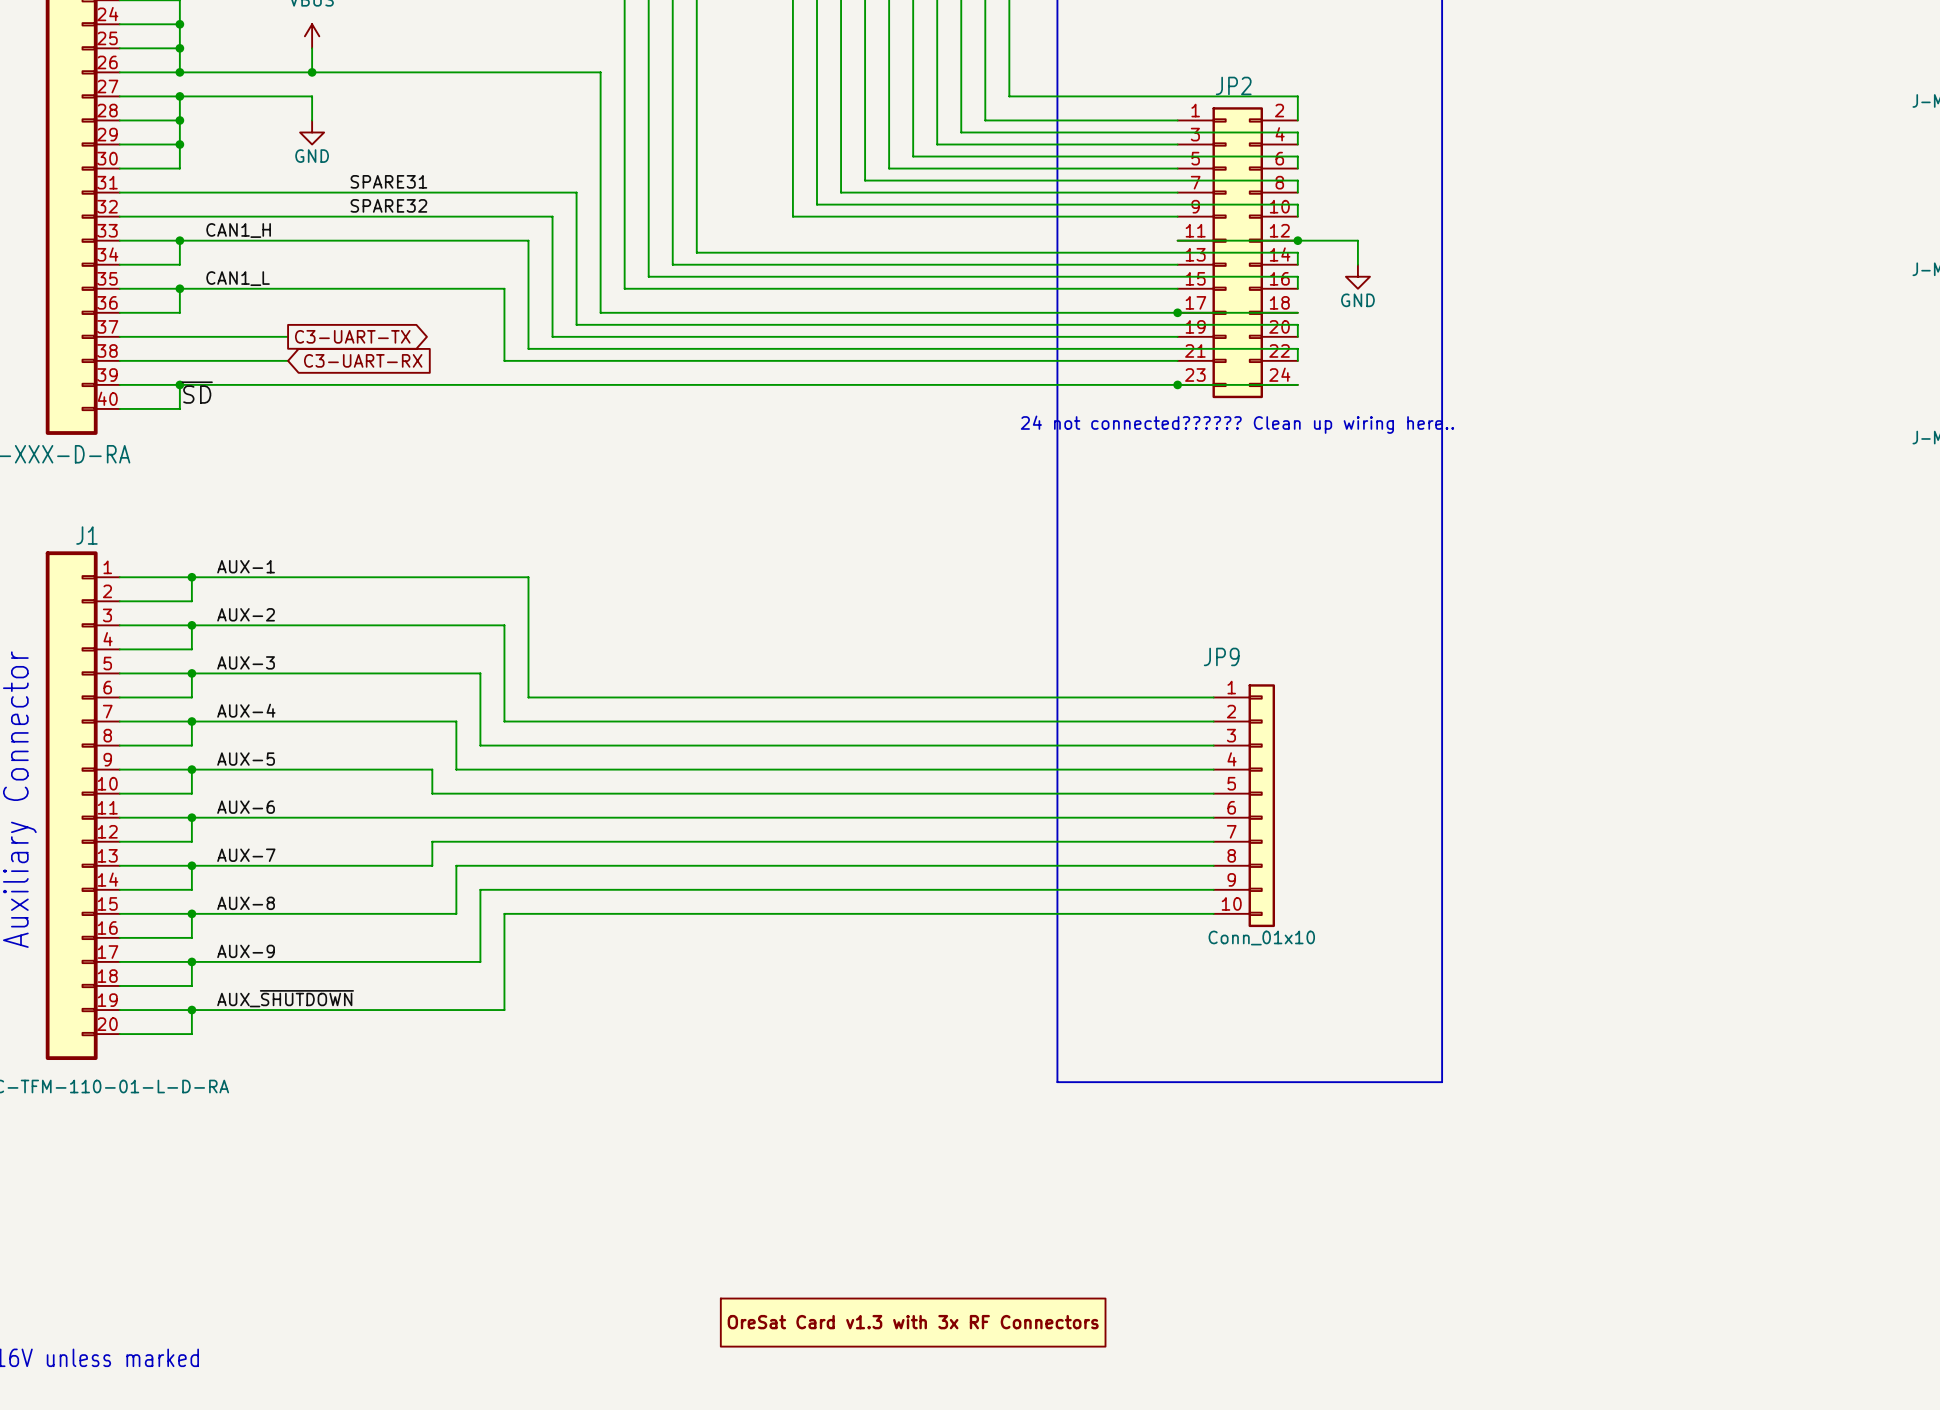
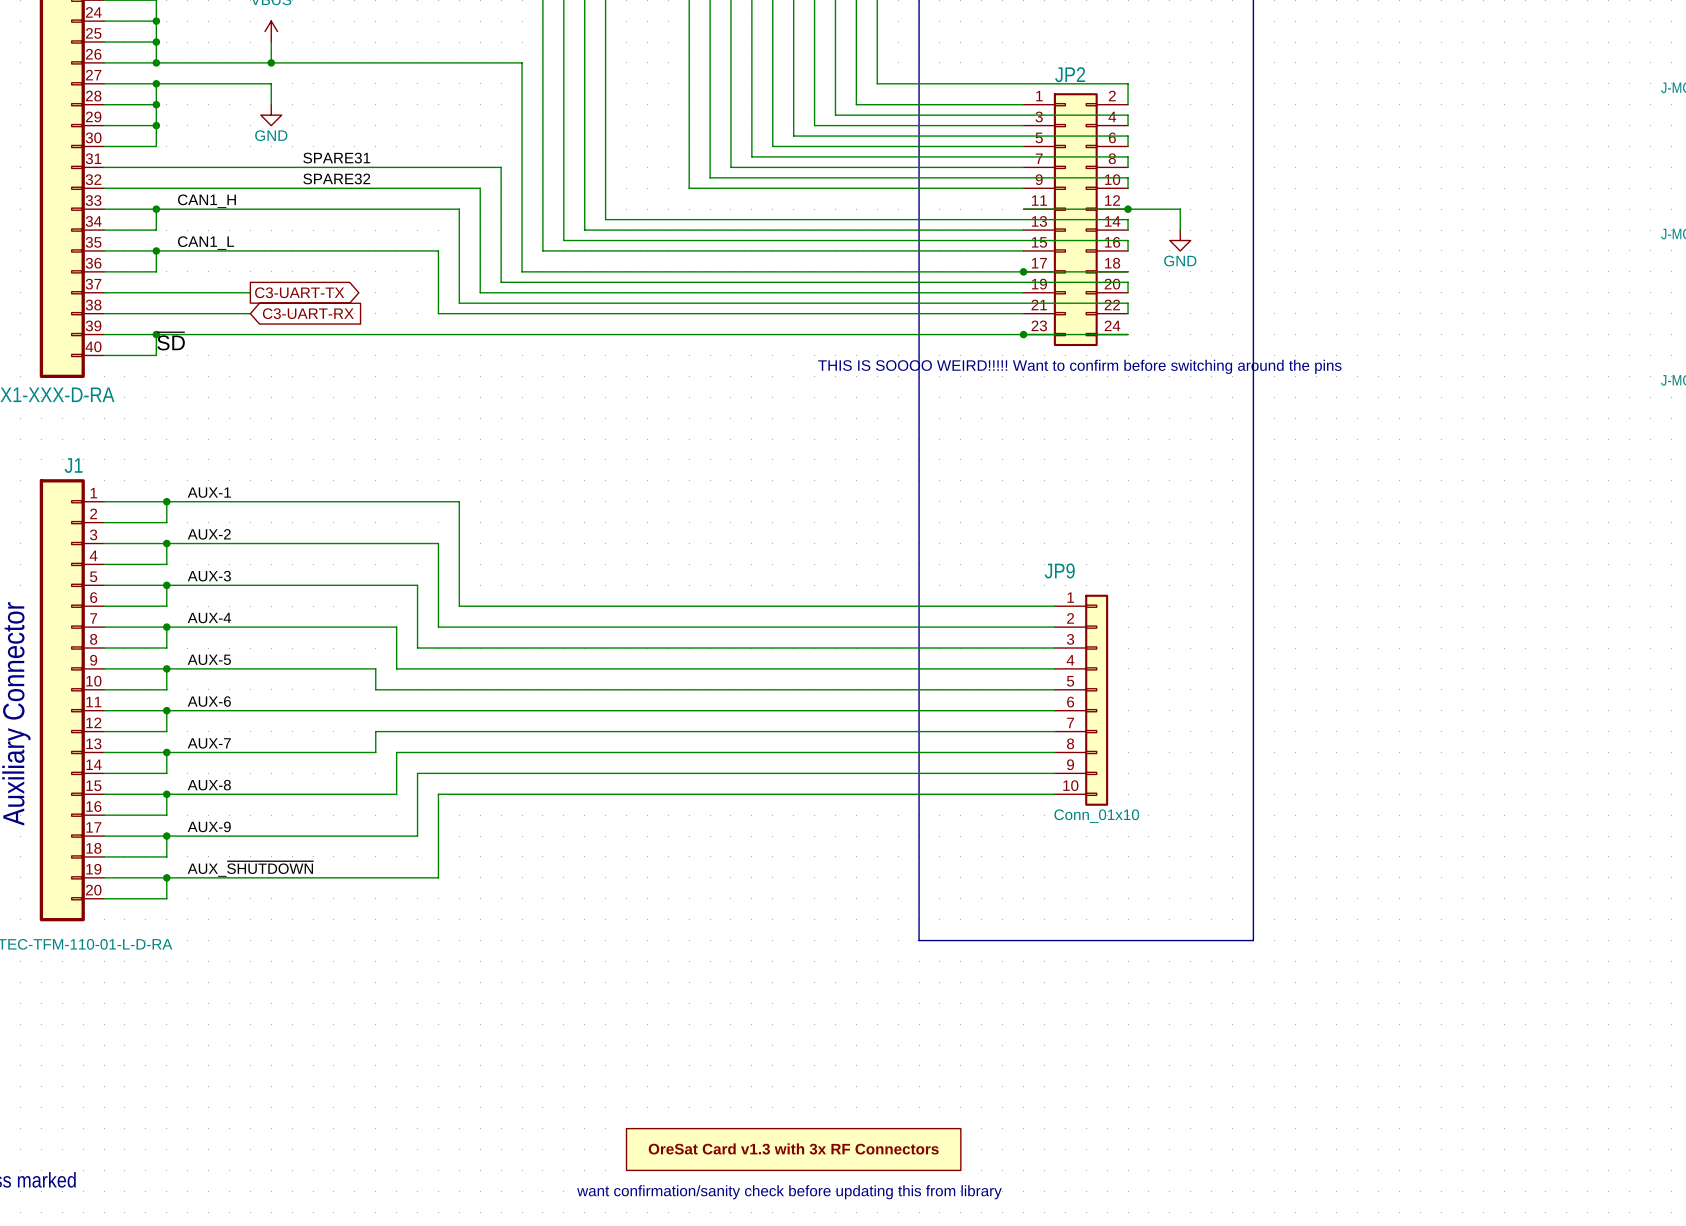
text: 24 not connected?????? Clean up wiring here.. (1237, 424) -> THIS IS SOOOO WEIRD!!!!! Want to confirm before switching around the pins (1079, 366)
text: none -> want confirmation/sanity check before updating this from library (789, 1192)

